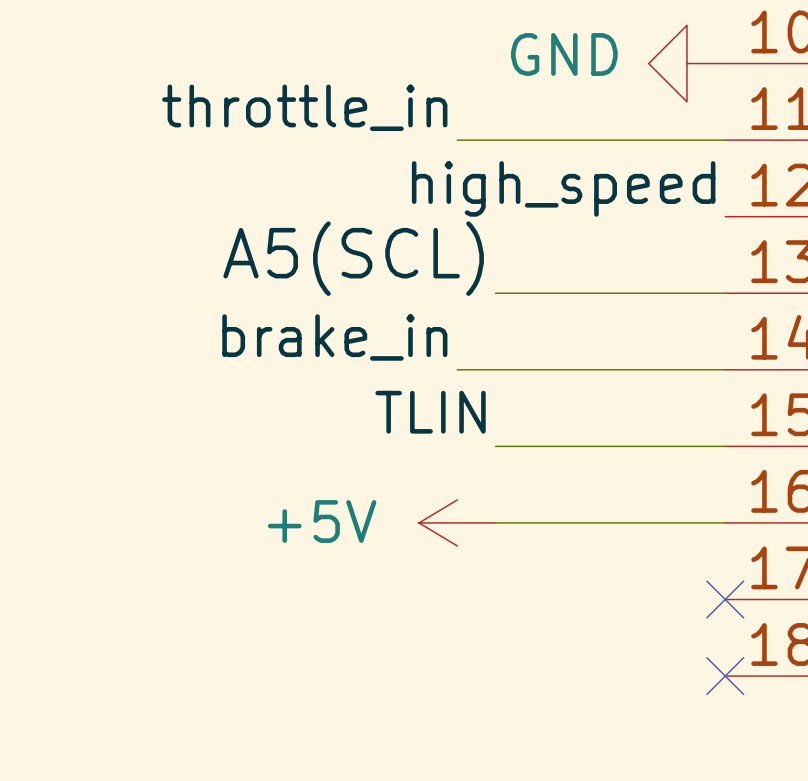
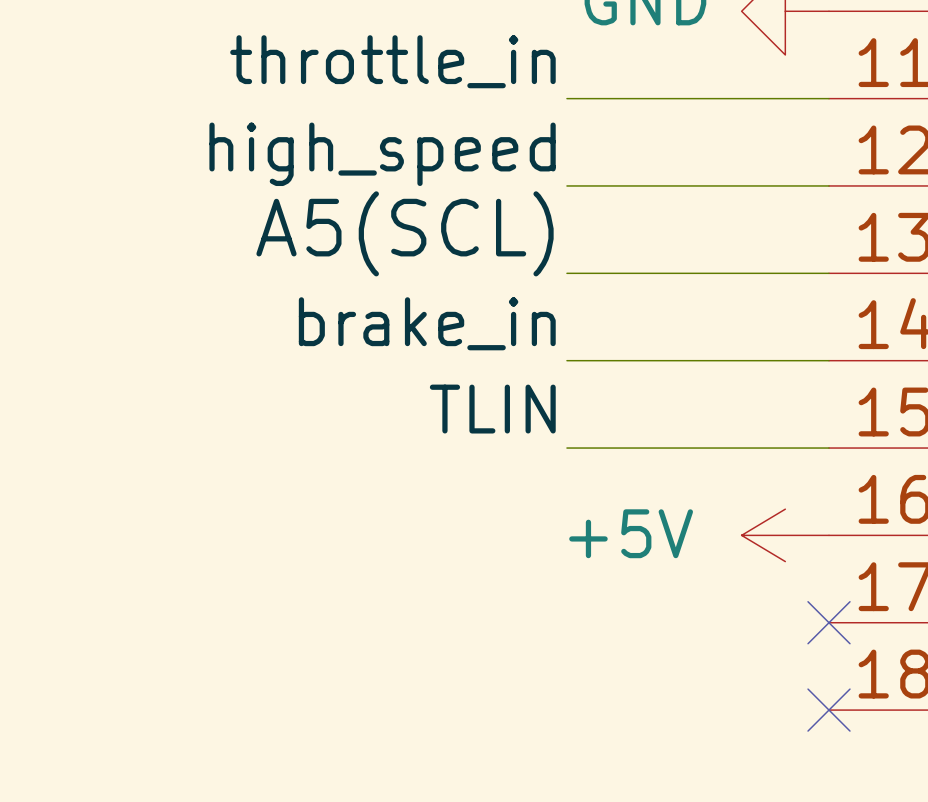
label position: throttle_in (304, 107) -> throttle_in (392, 61)
wire: (457, 140) (495, 140) -> none
label position: high_speed (563, 188) -> high_speed (382, 154)
label position: brake_in (334, 337) -> brake_in (427, 323)
wire: (457, 369) (495, 369) -> none
power symbol position: +5V (457, 522) -> +5V (785, 535)
wire: (495, 522) (725, 522) -> (566, 185) (829, 185)

